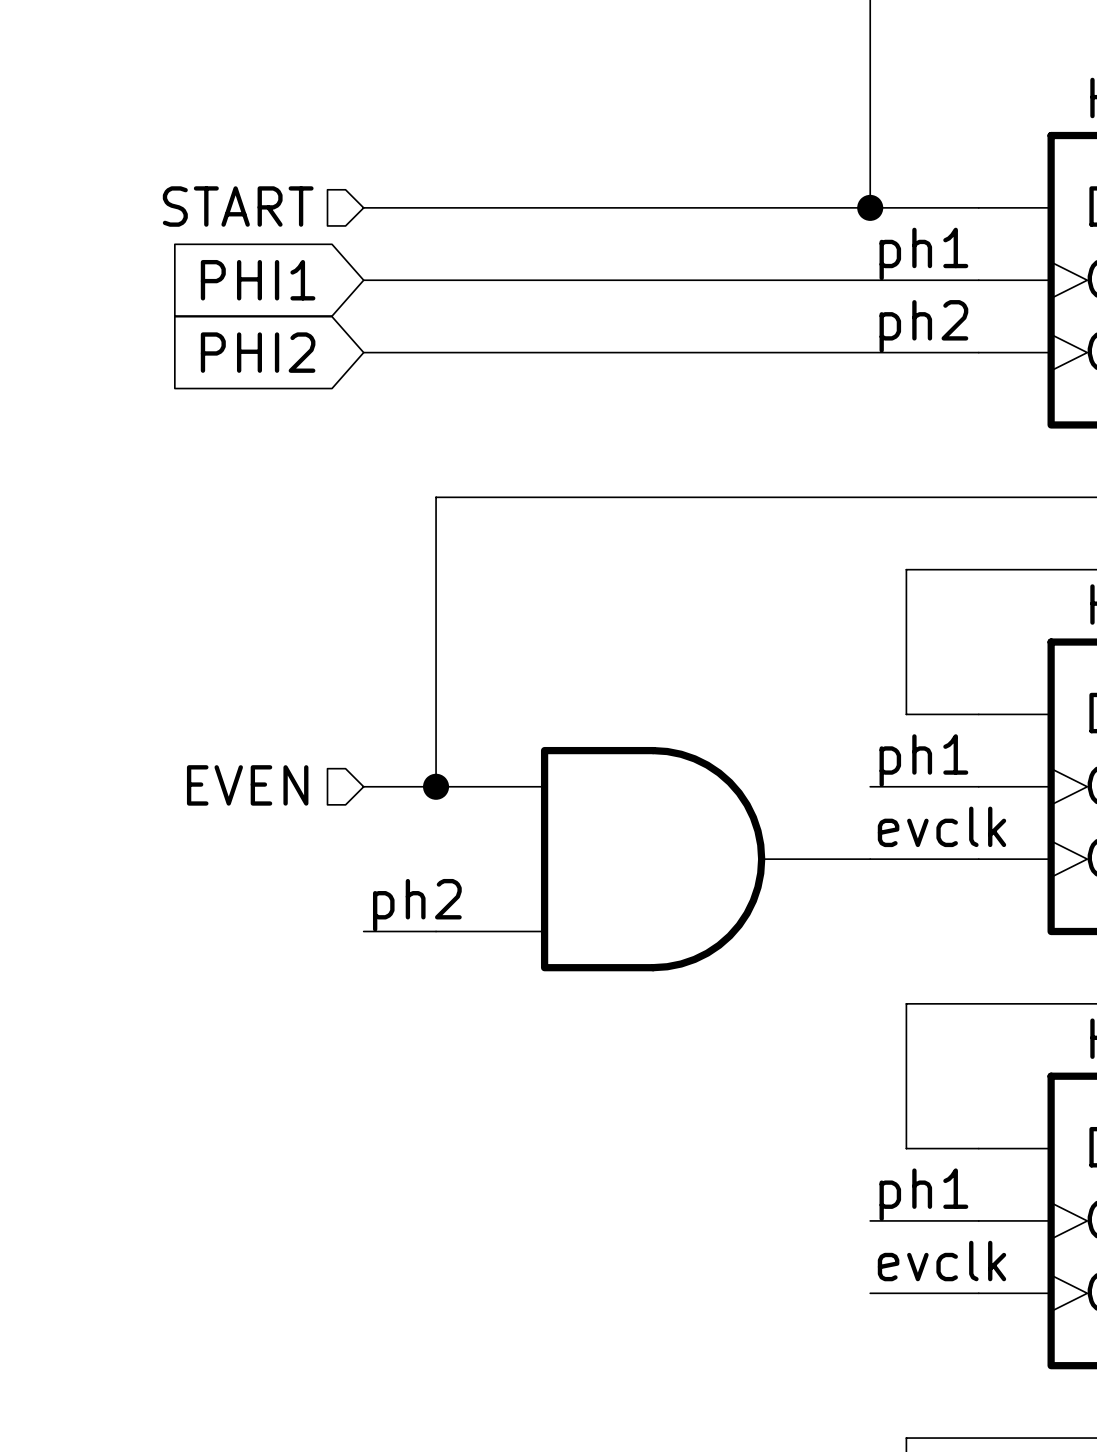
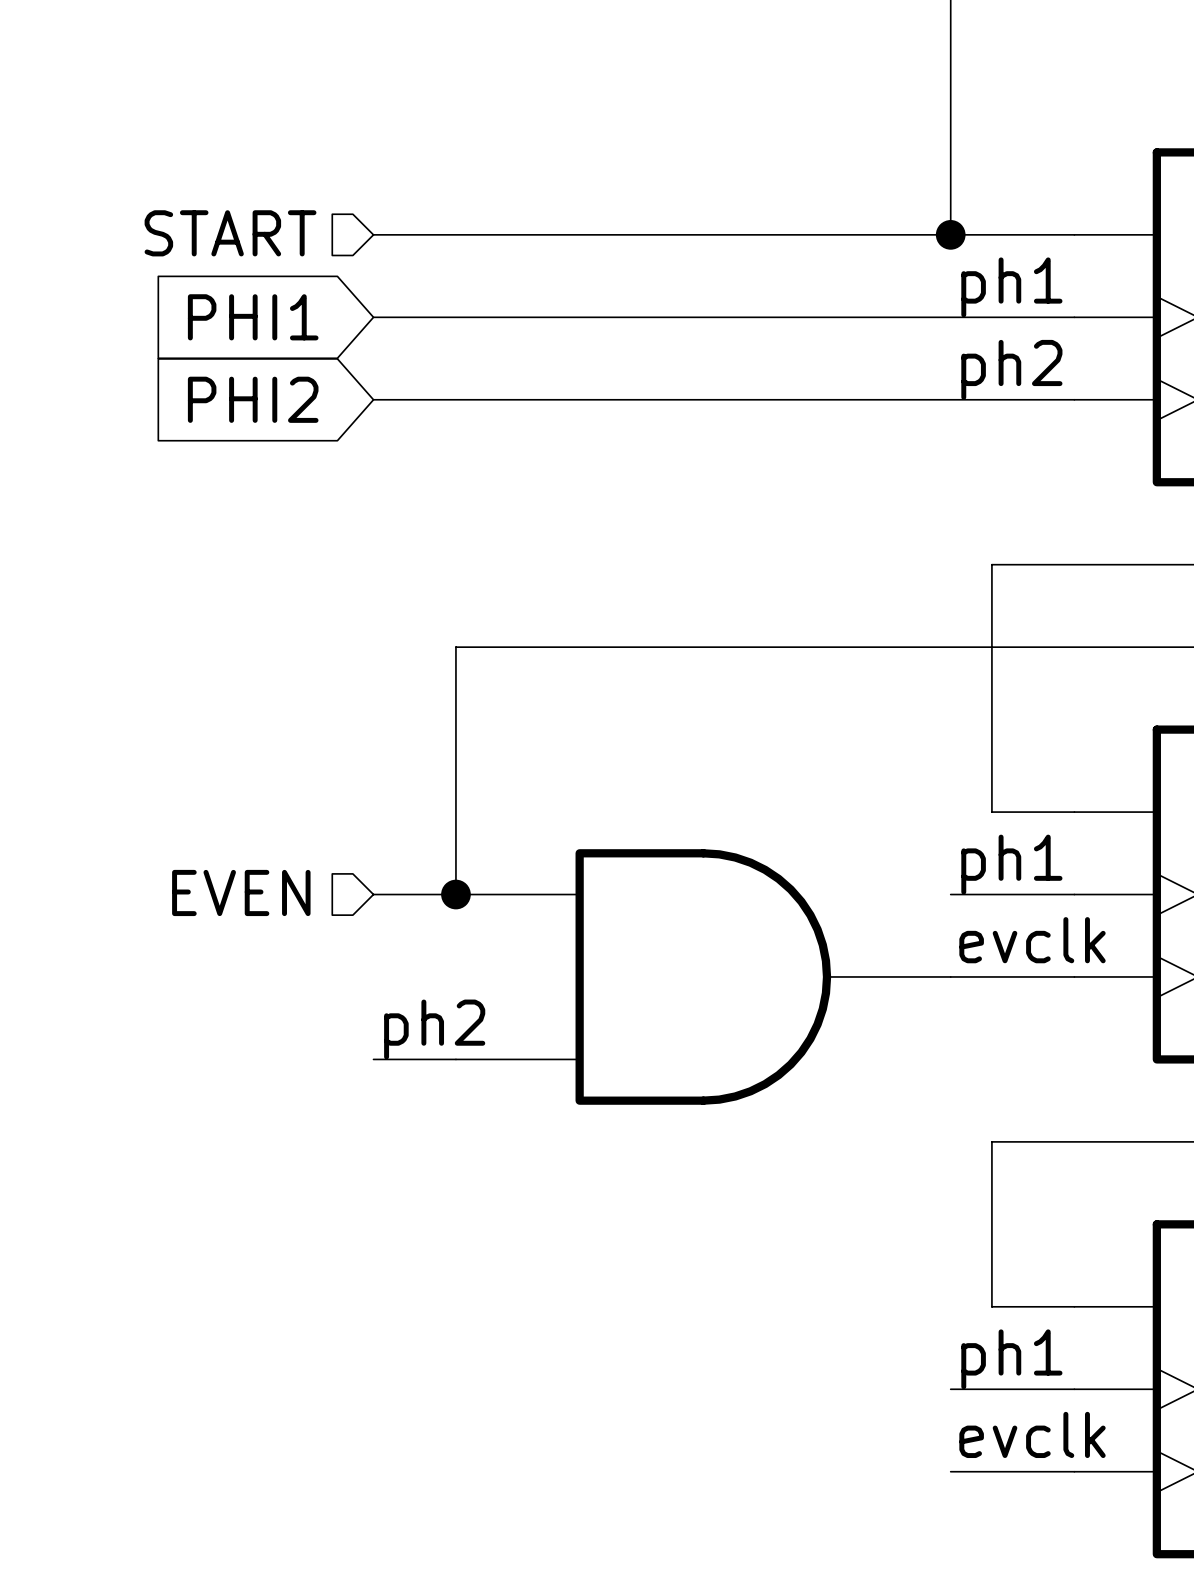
wire: (906, 497) (436, 497) (436, 569) -> (991, 564) (991, 647) (455, 647)

